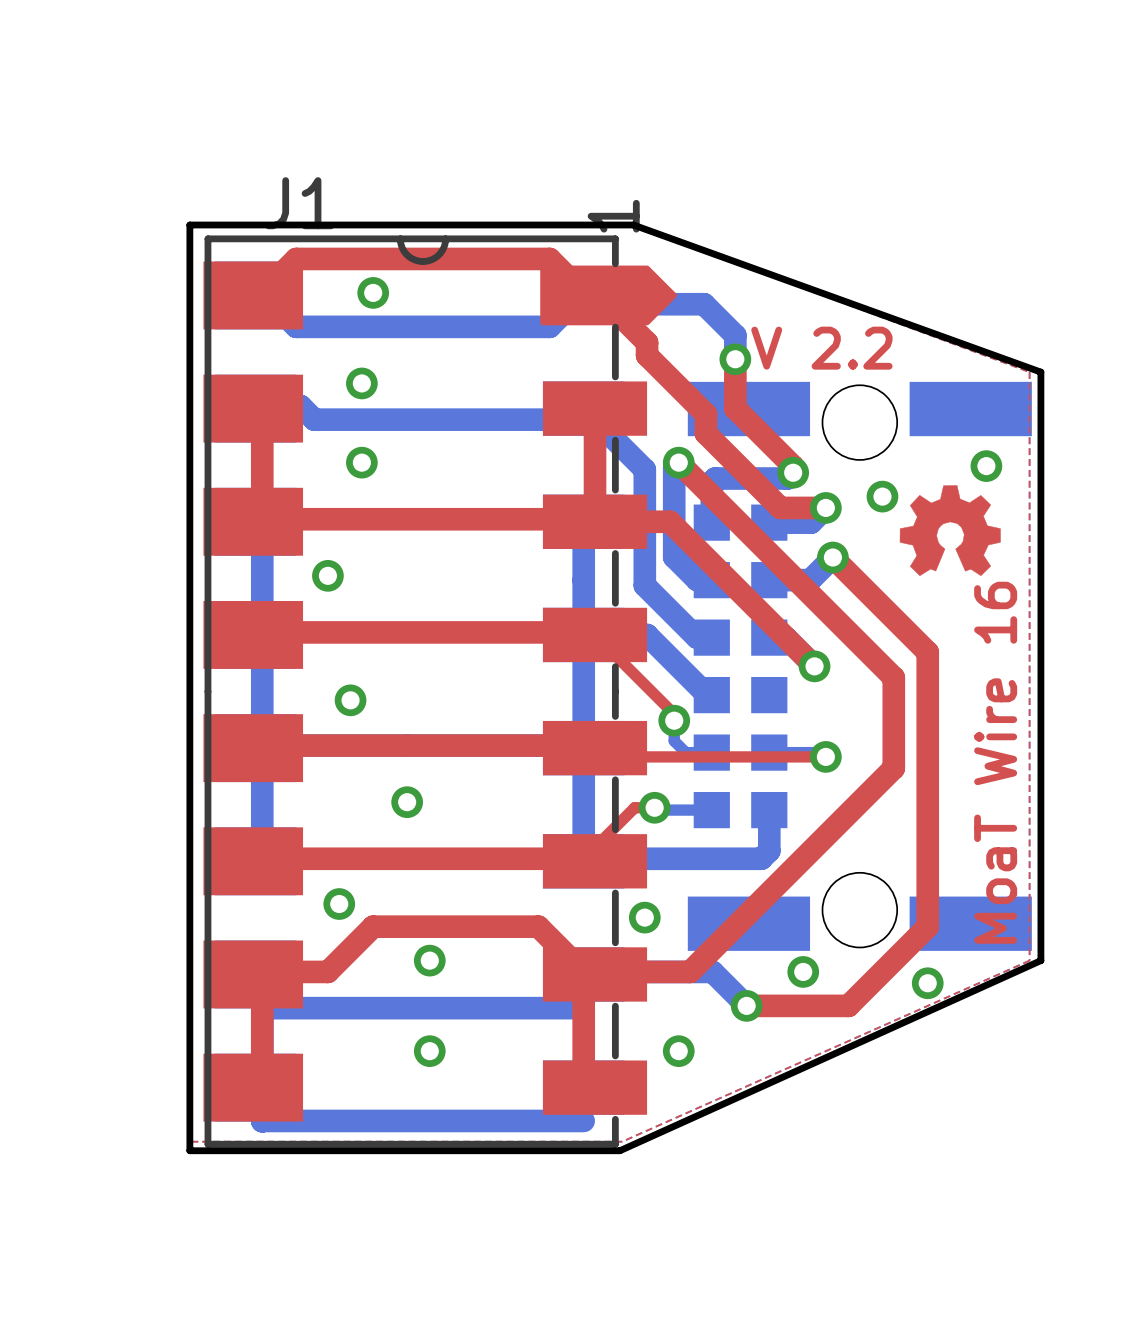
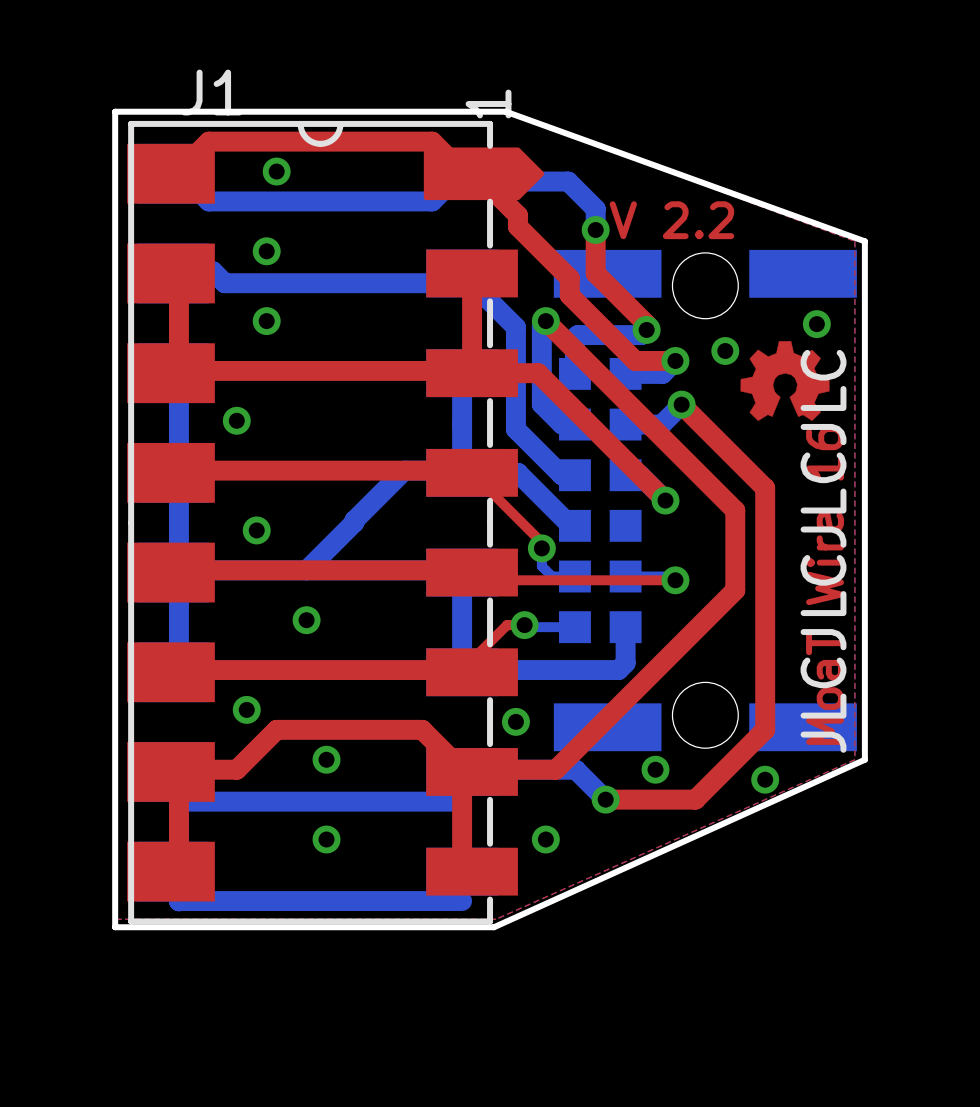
bottom track: none -> (462, 470) (404, 470) (306, 570)
bottom track: (583, 646) (583, 745) -> none
text: none -> JLCJLCJLCJLC (823, 551)

